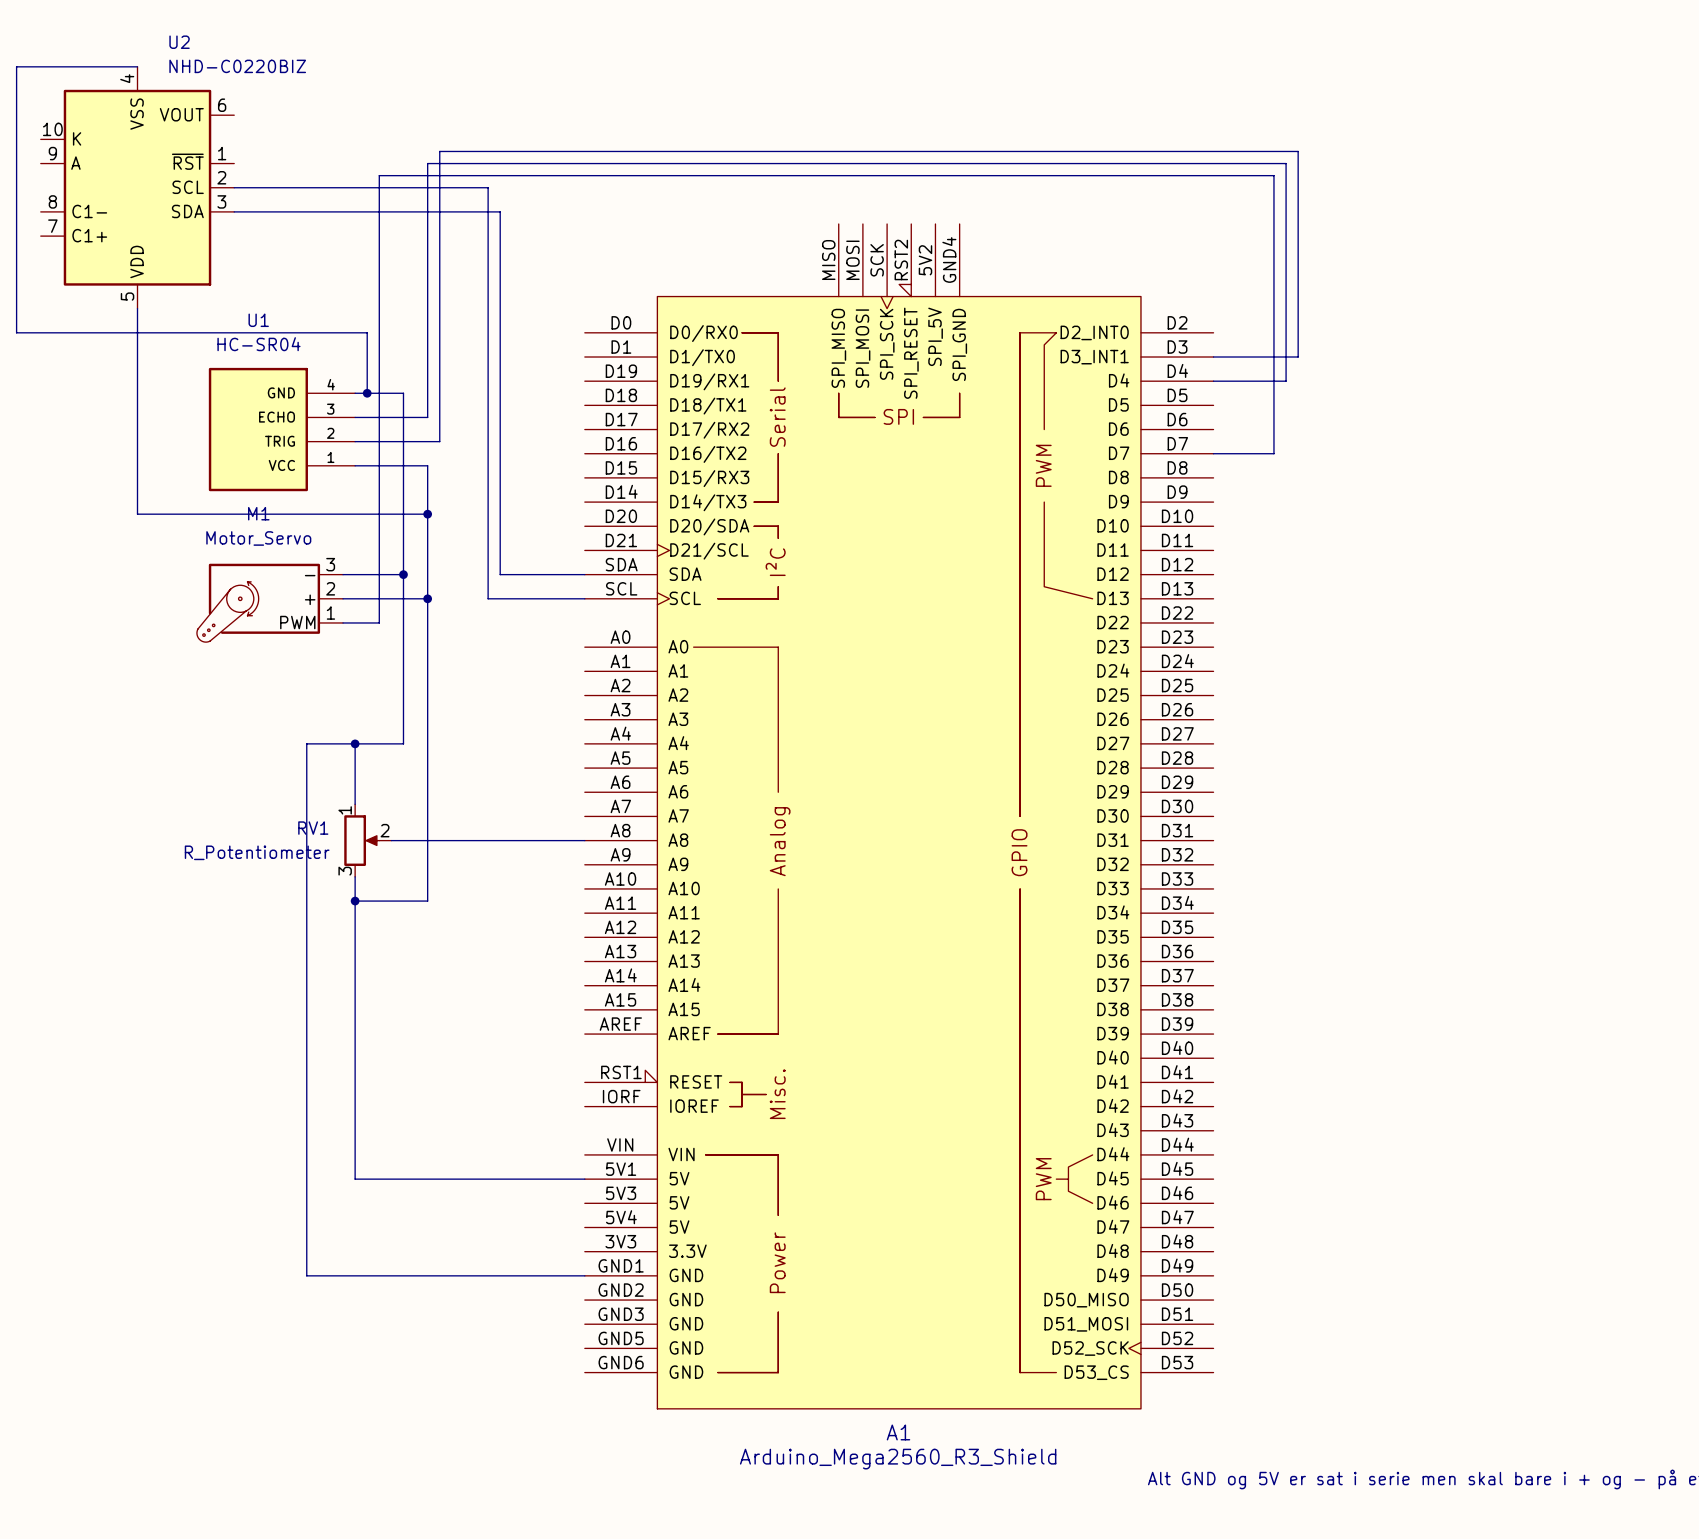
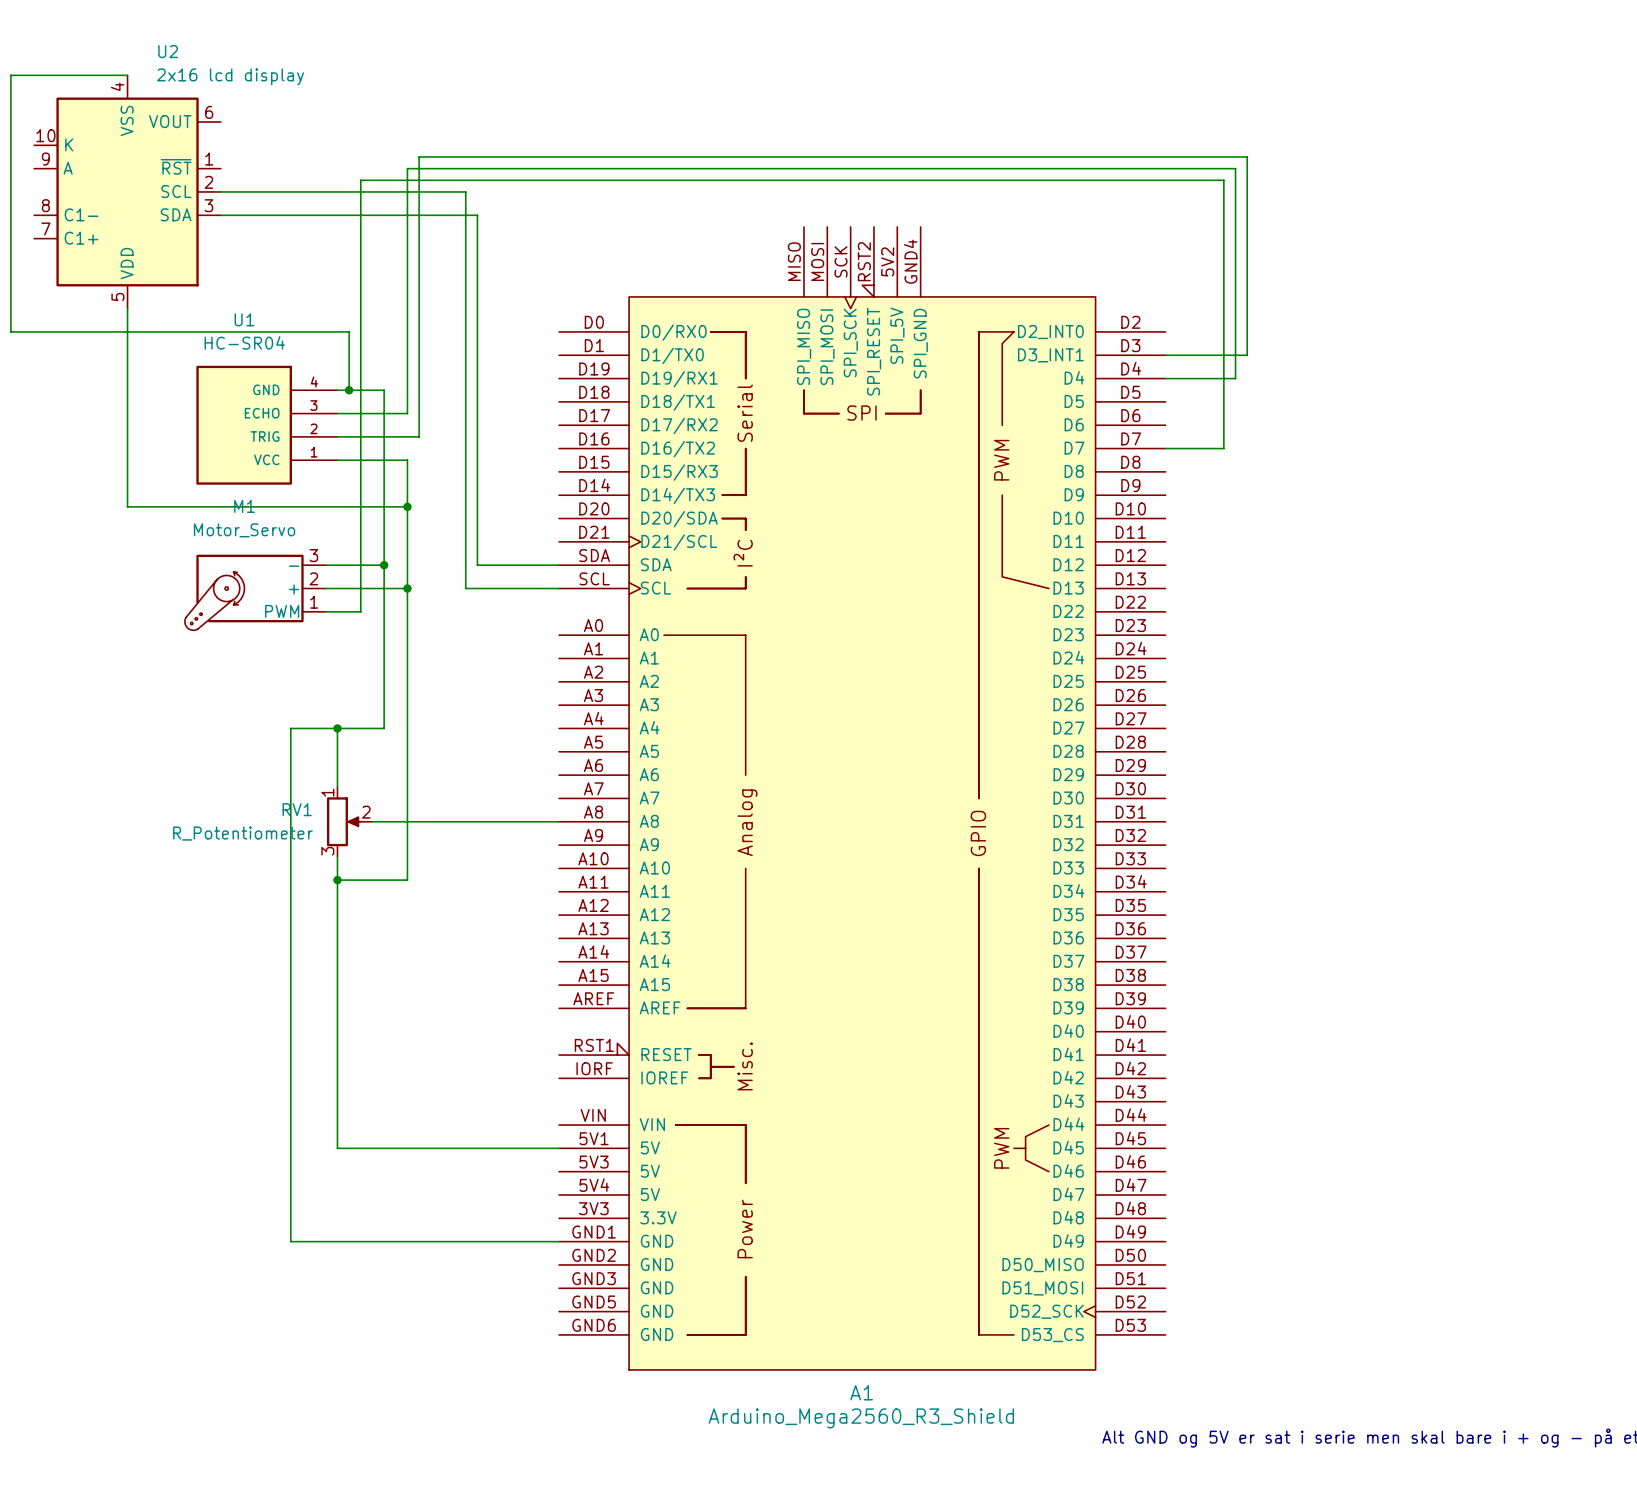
U2 value: NHD-C0220BIZ (237, 66) -> 2x16 lcd display (230, 76)

